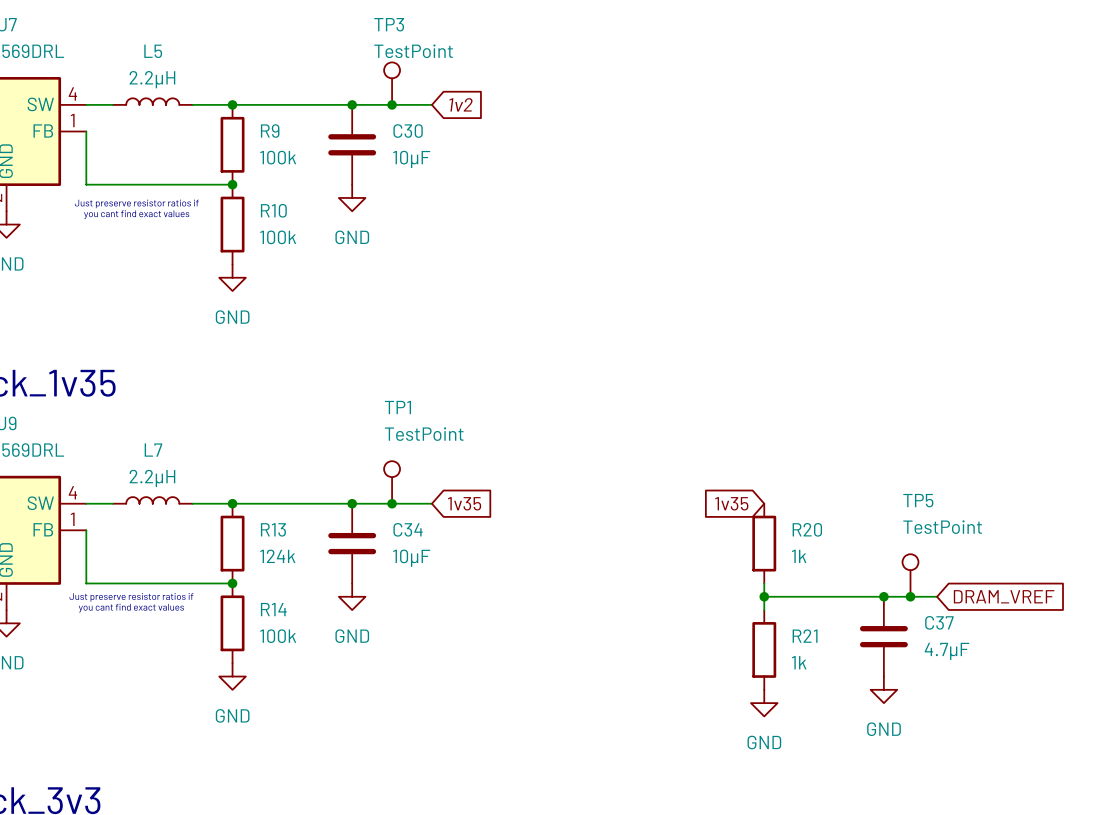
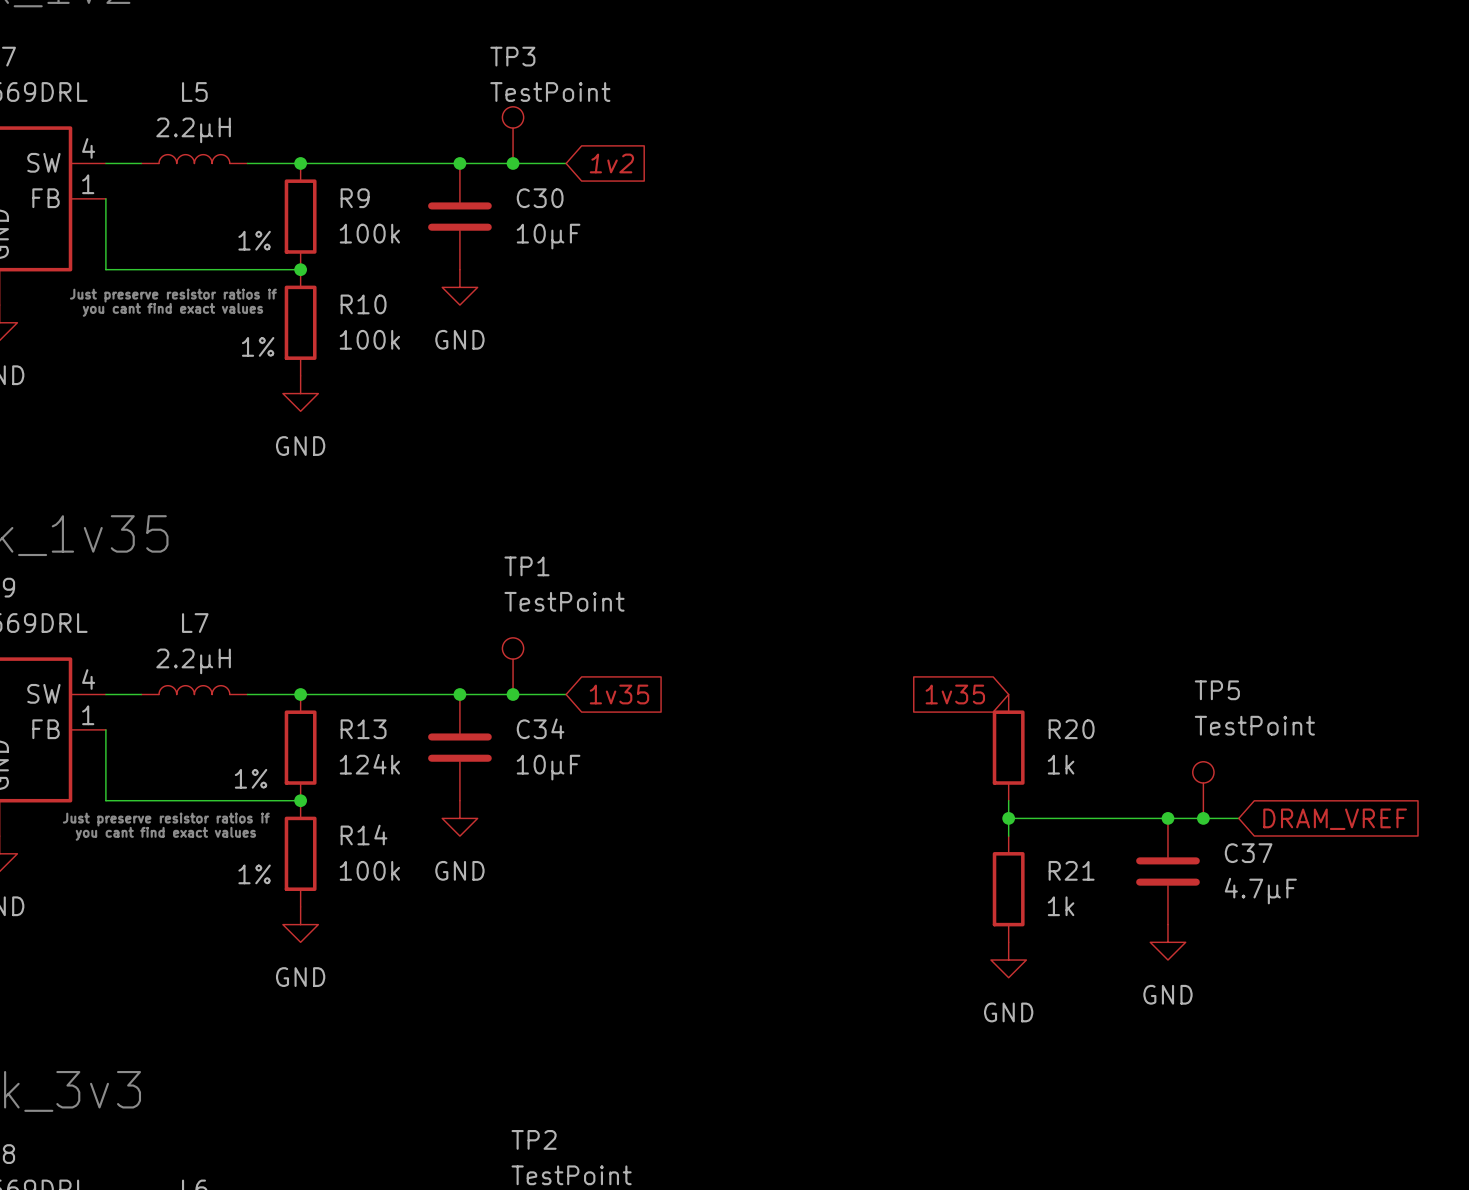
R9 text: none -> 1% (254, 240)
R10 text: none -> 1% (258, 346)
R13 text: none -> 1% (251, 778)
R14 text: none -> 1% (254, 874)

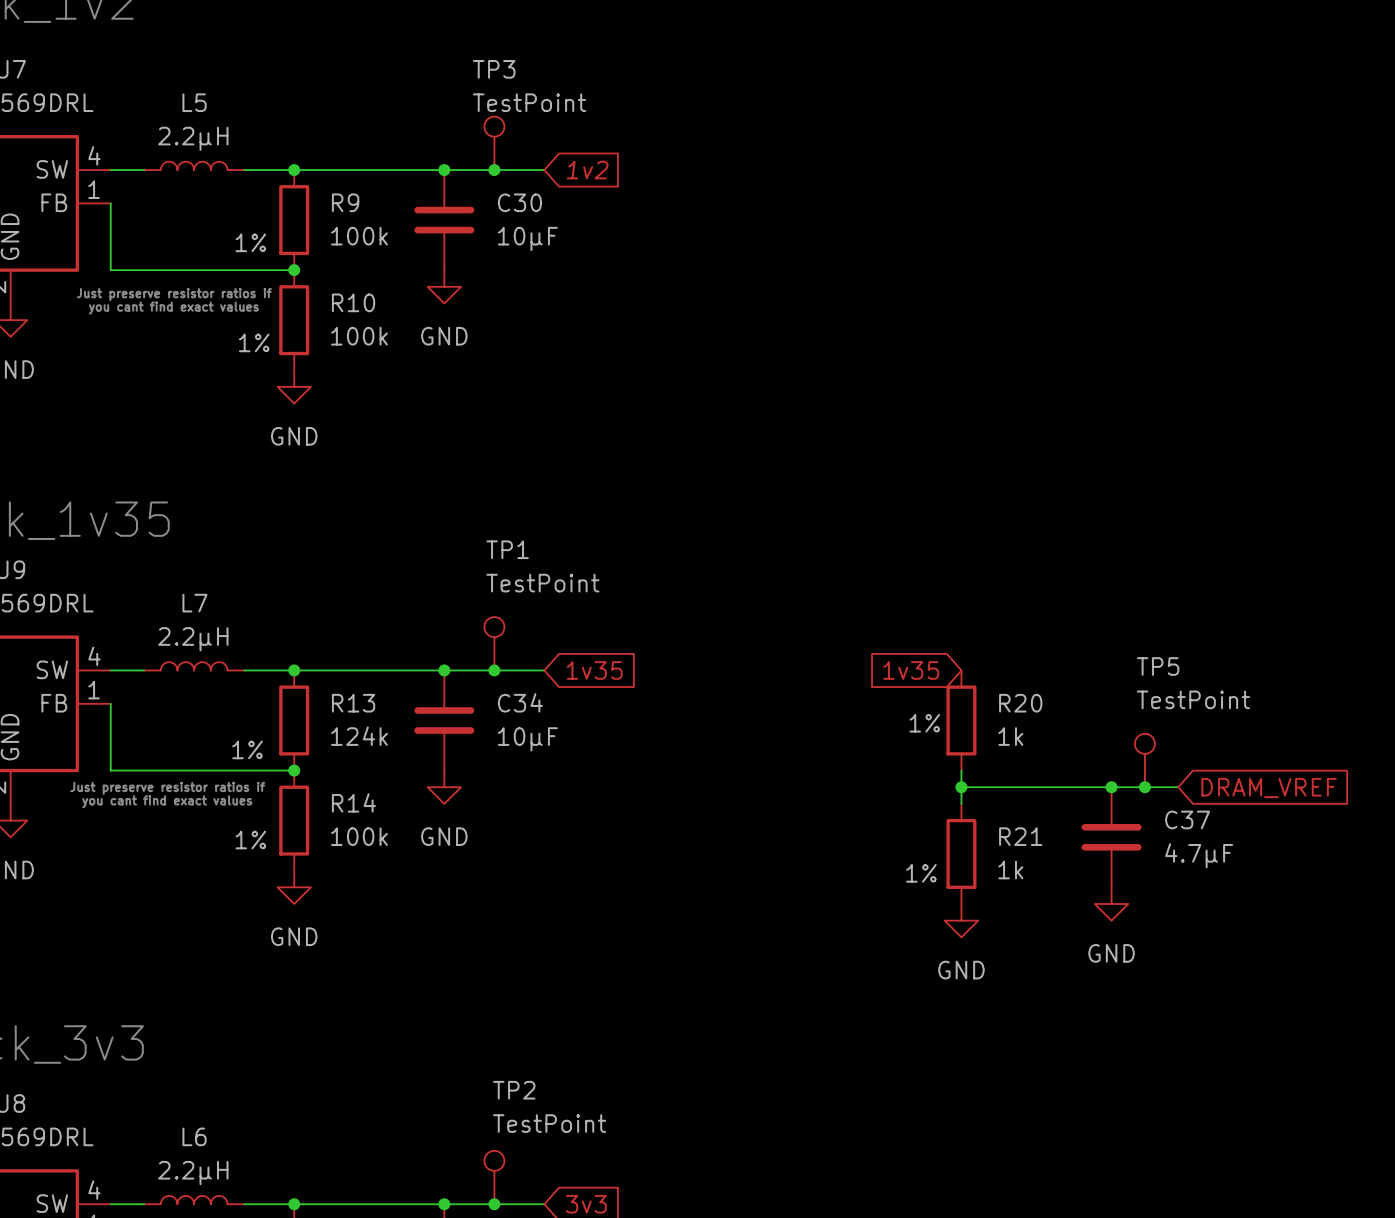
R20 text: none -> 1% (924, 723)
R21 text: none -> 1% (921, 873)

